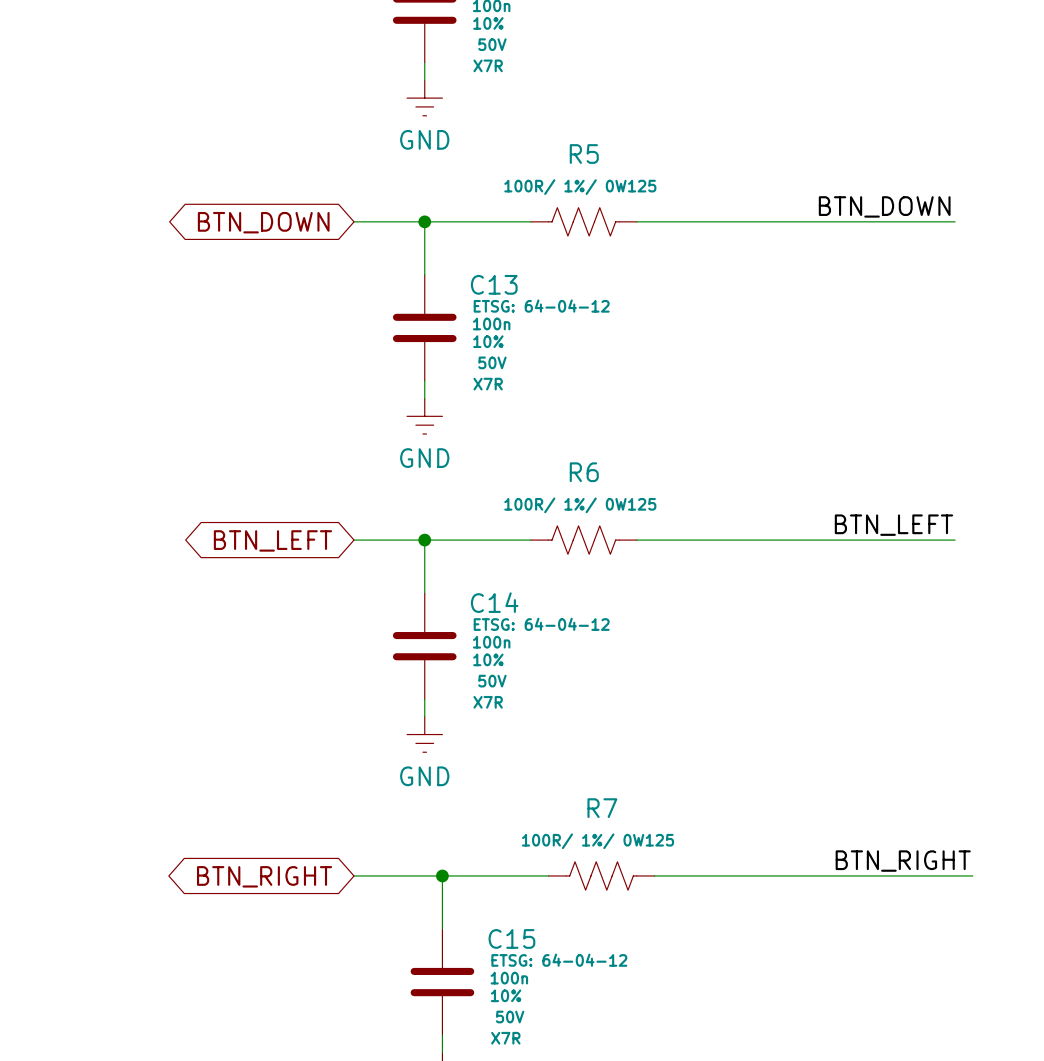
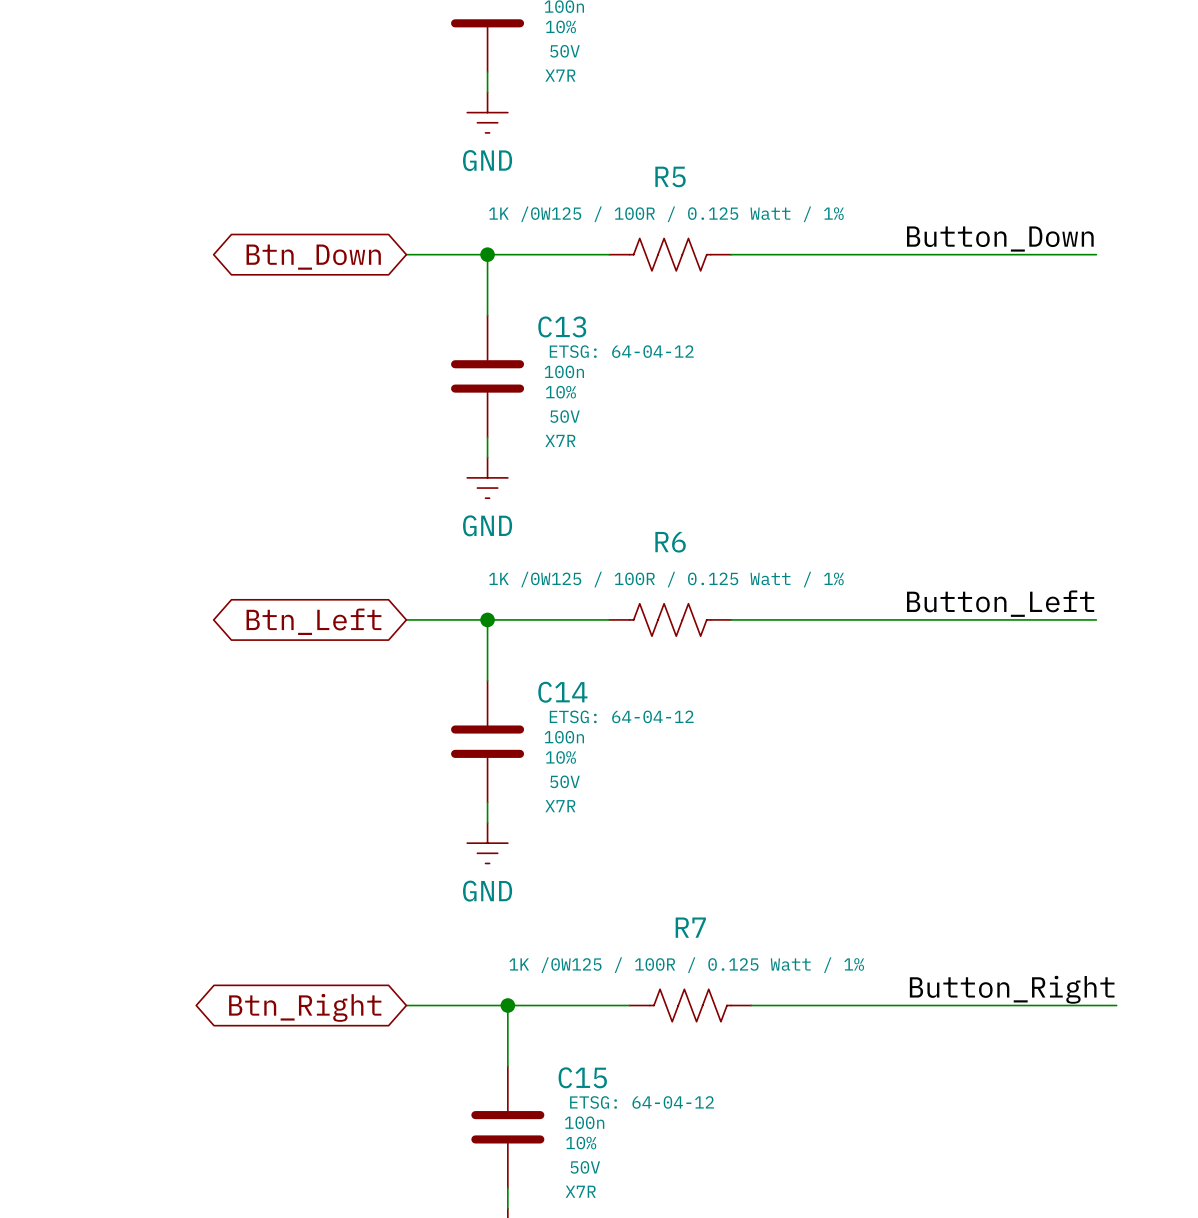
R5 value: 100R/ 1%/ 0W125 (580, 187) -> 1K /0W125 / 100R / 0.125 Watt / 1% (666, 214)
label: BTN_DOWN (884, 206) -> Button_Down (1000, 239)
global label: BTN_DOWN (263, 222) -> Btn_Down (313, 257)
R6 value: 100R/ 1%/ 0W125 (580, 505) -> 1K /0W125 / 100R / 0.125 Watt / 1% (666, 579)
label: BTN_LEFT (893, 525) -> Button_Left (1000, 603)
global label: BTN_LEFT (272, 540) -> Btn_Left (313, 621)
R7 value: 100R/ 1%/ 0W125 (598, 841) -> 1K /0W125 / 100R / 0.125 Watt / 1% (686, 965)
label: BTN_RIGHT (903, 861) -> Button_Right (1012, 989)
global label: BTN_RIGHT (264, 876) -> Btn_Right (305, 1007)

